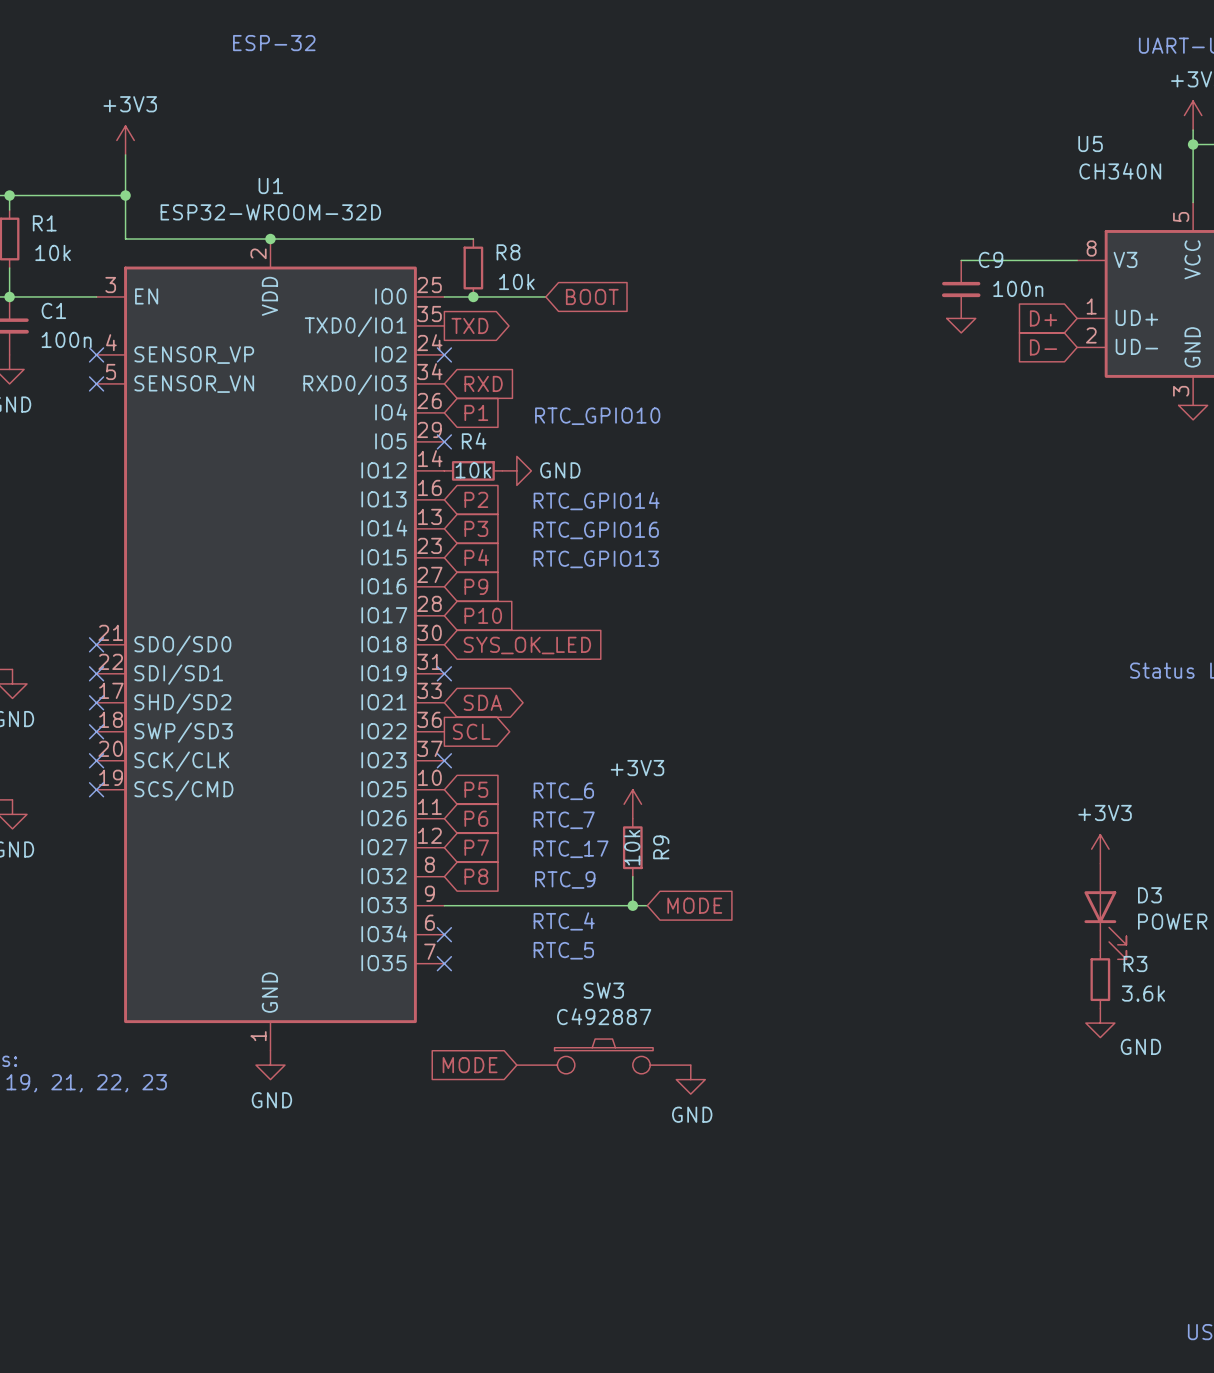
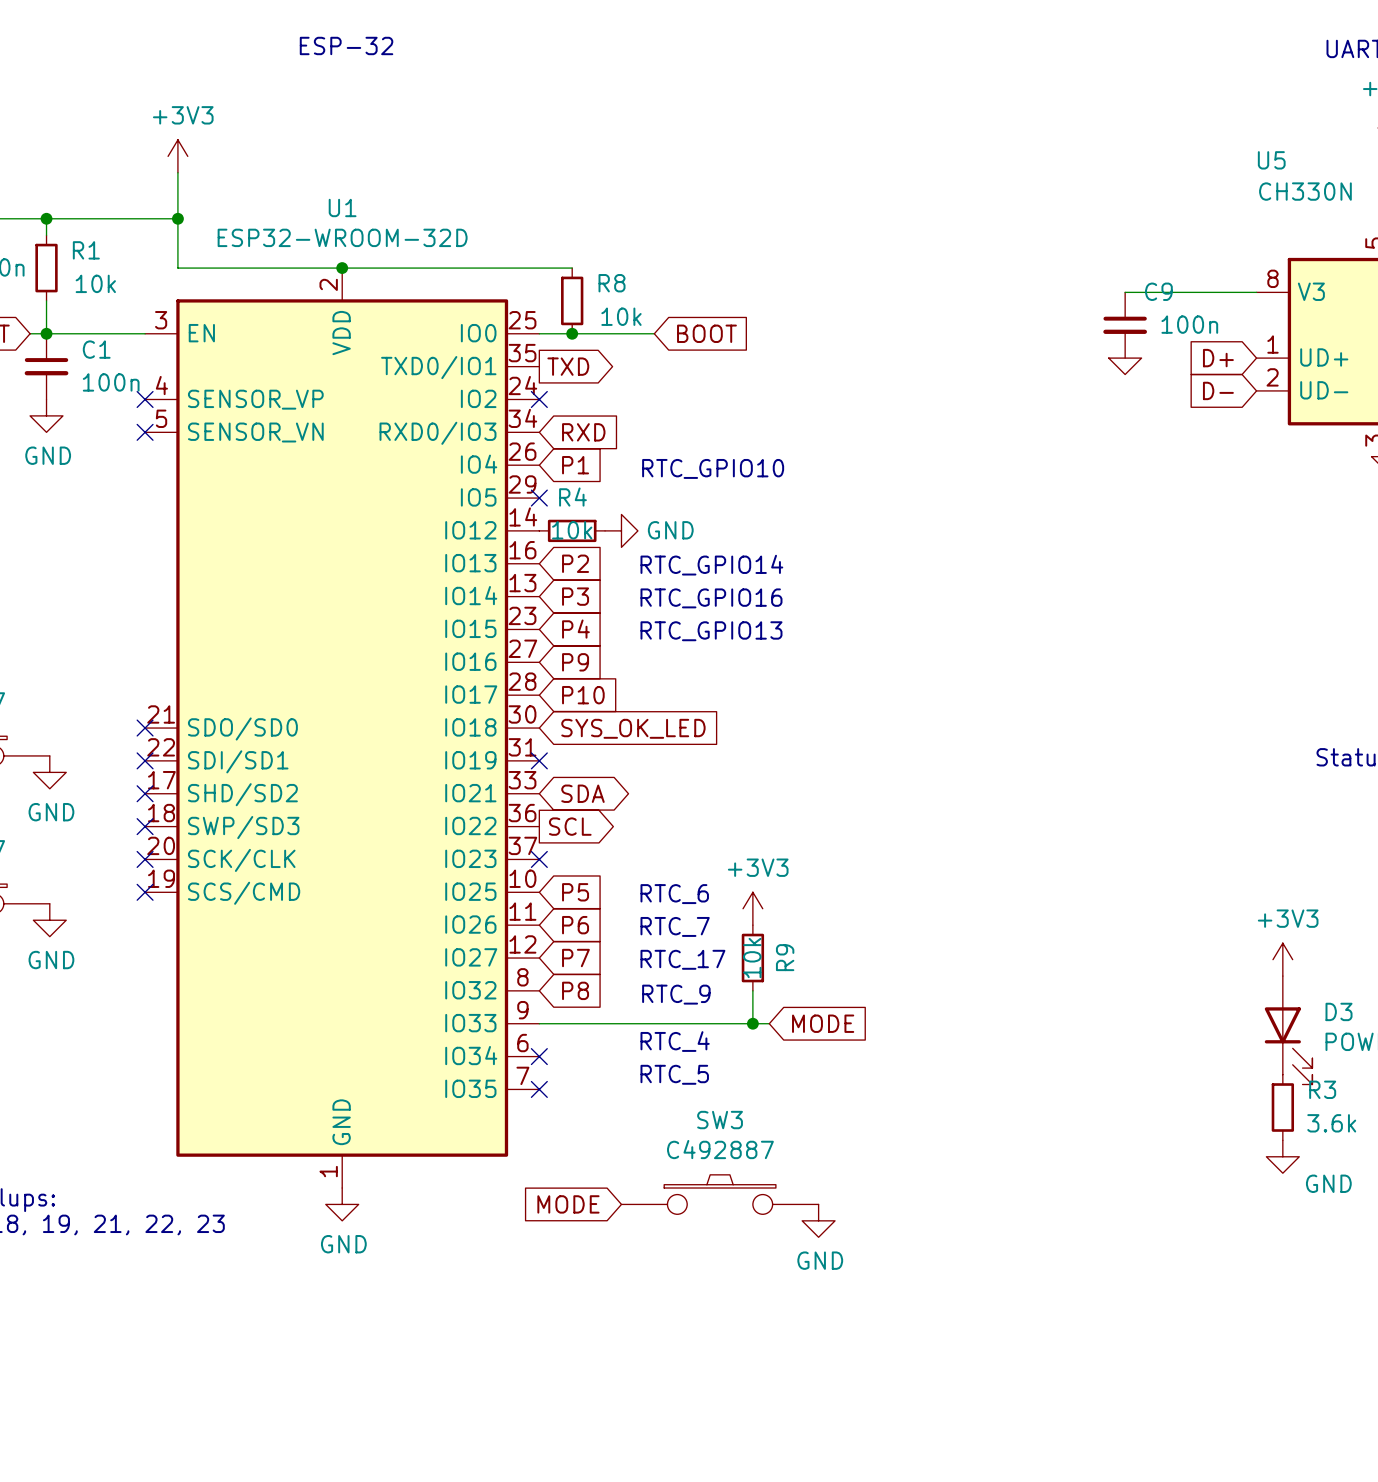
U5 value: CH340N (1120, 171) -> CH330N (1305, 191)

